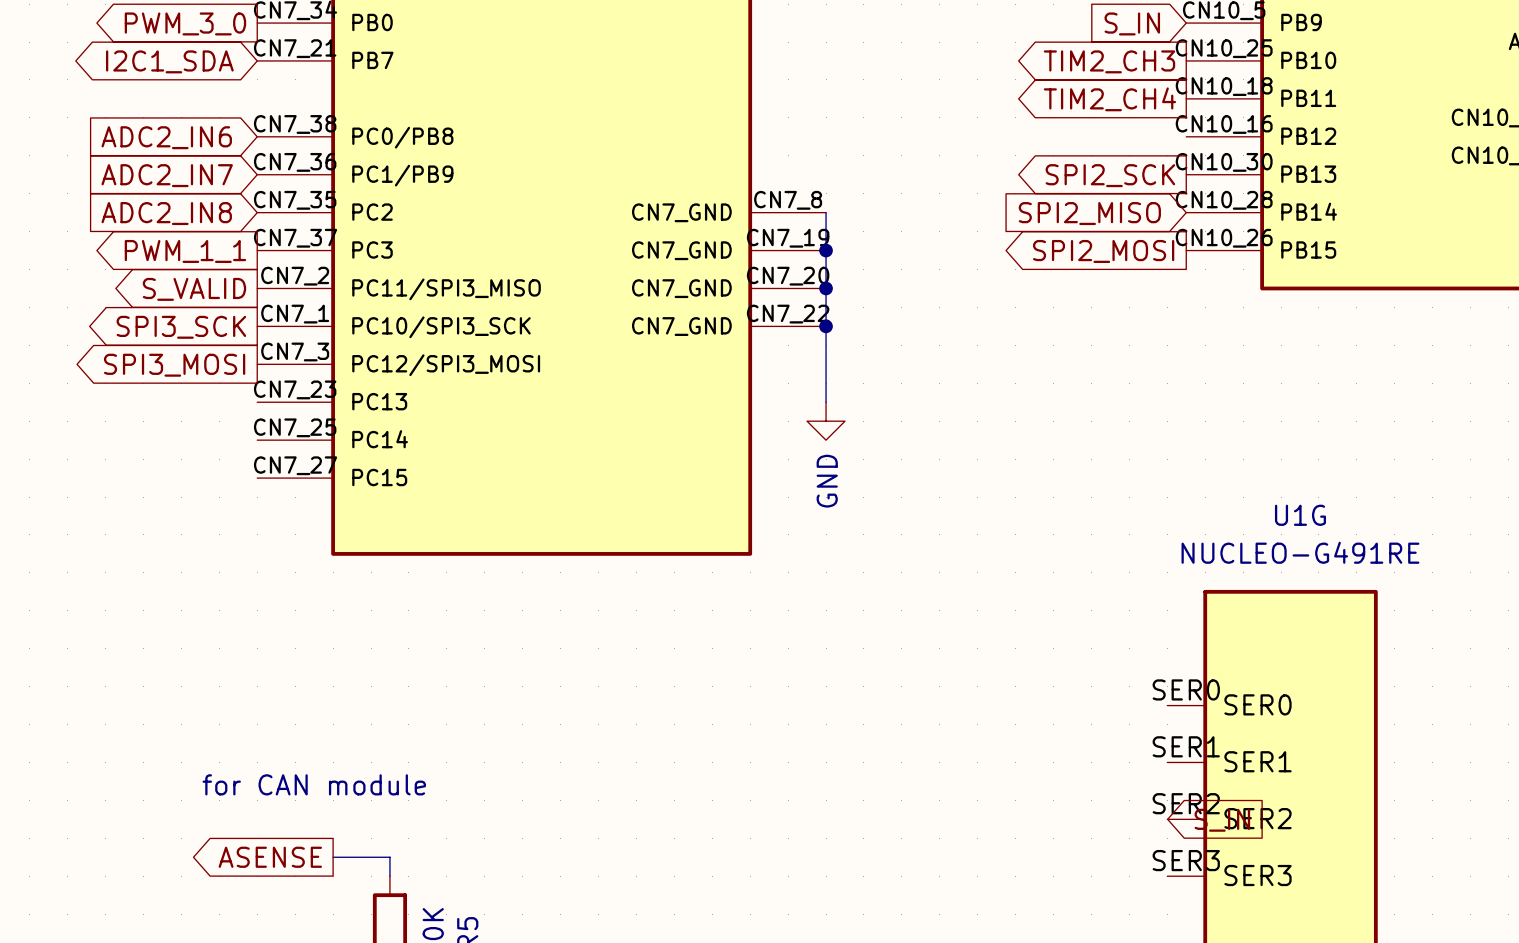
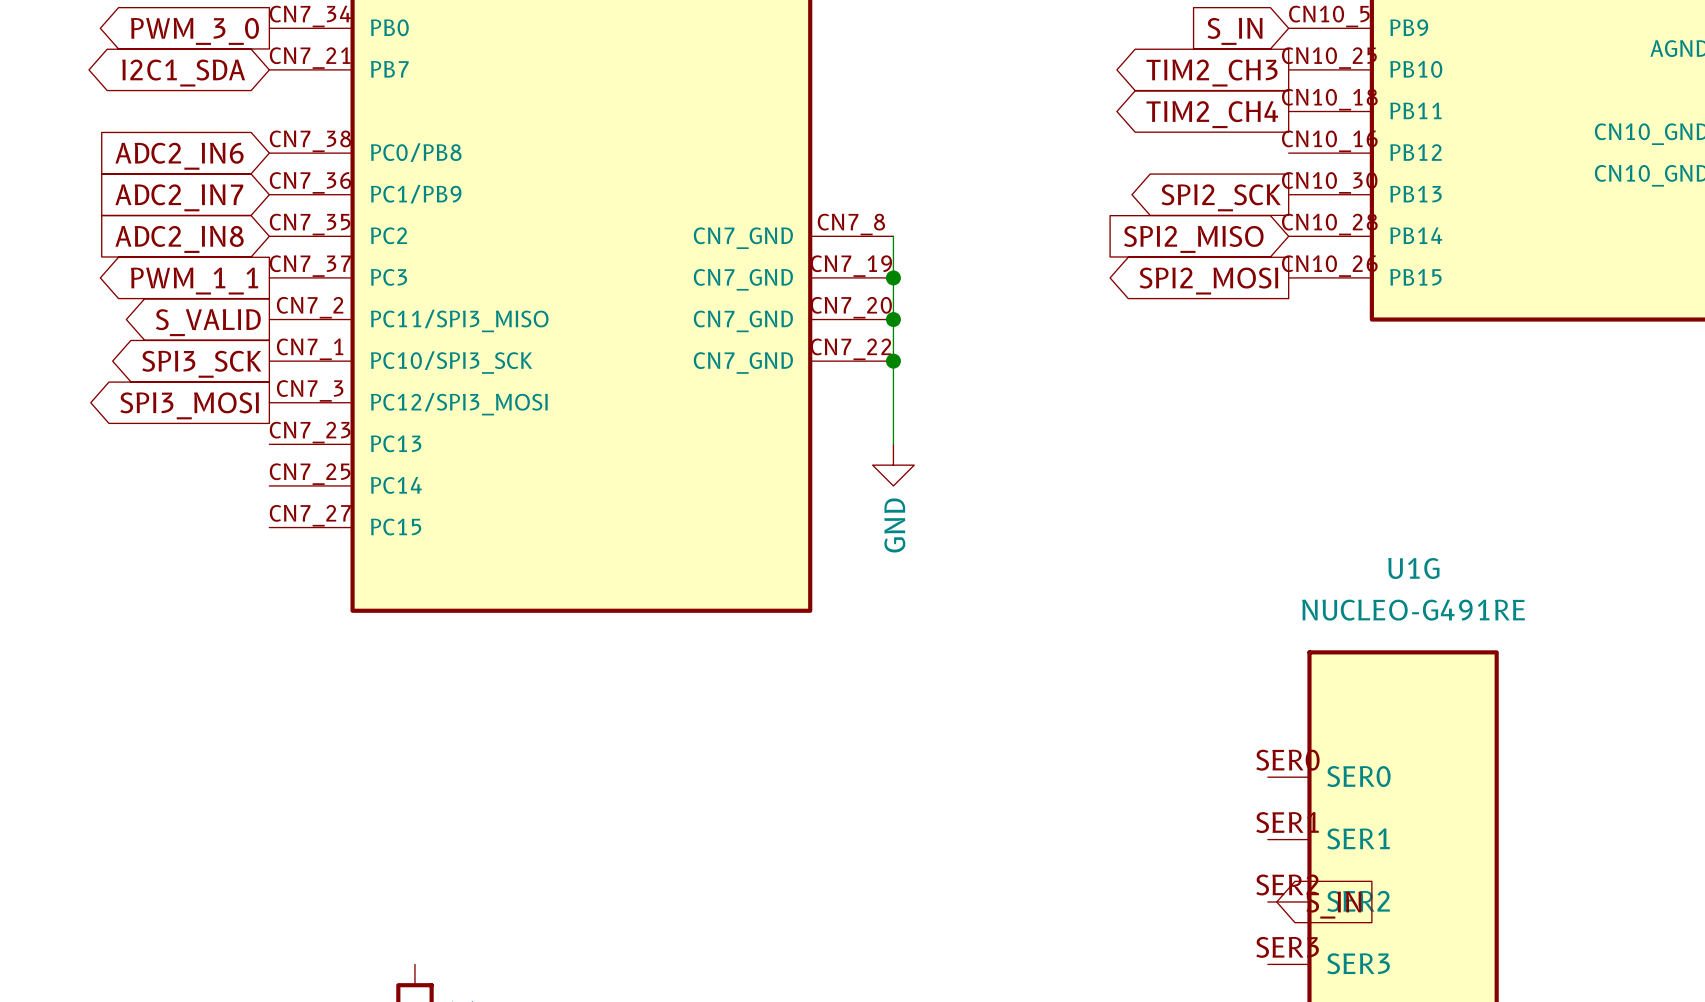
text: for CAN module (314, 784) -> none
global label: ASENSE (270, 857) -> none
wire: (333, 857) (389, 857) (389, 876) -> none

